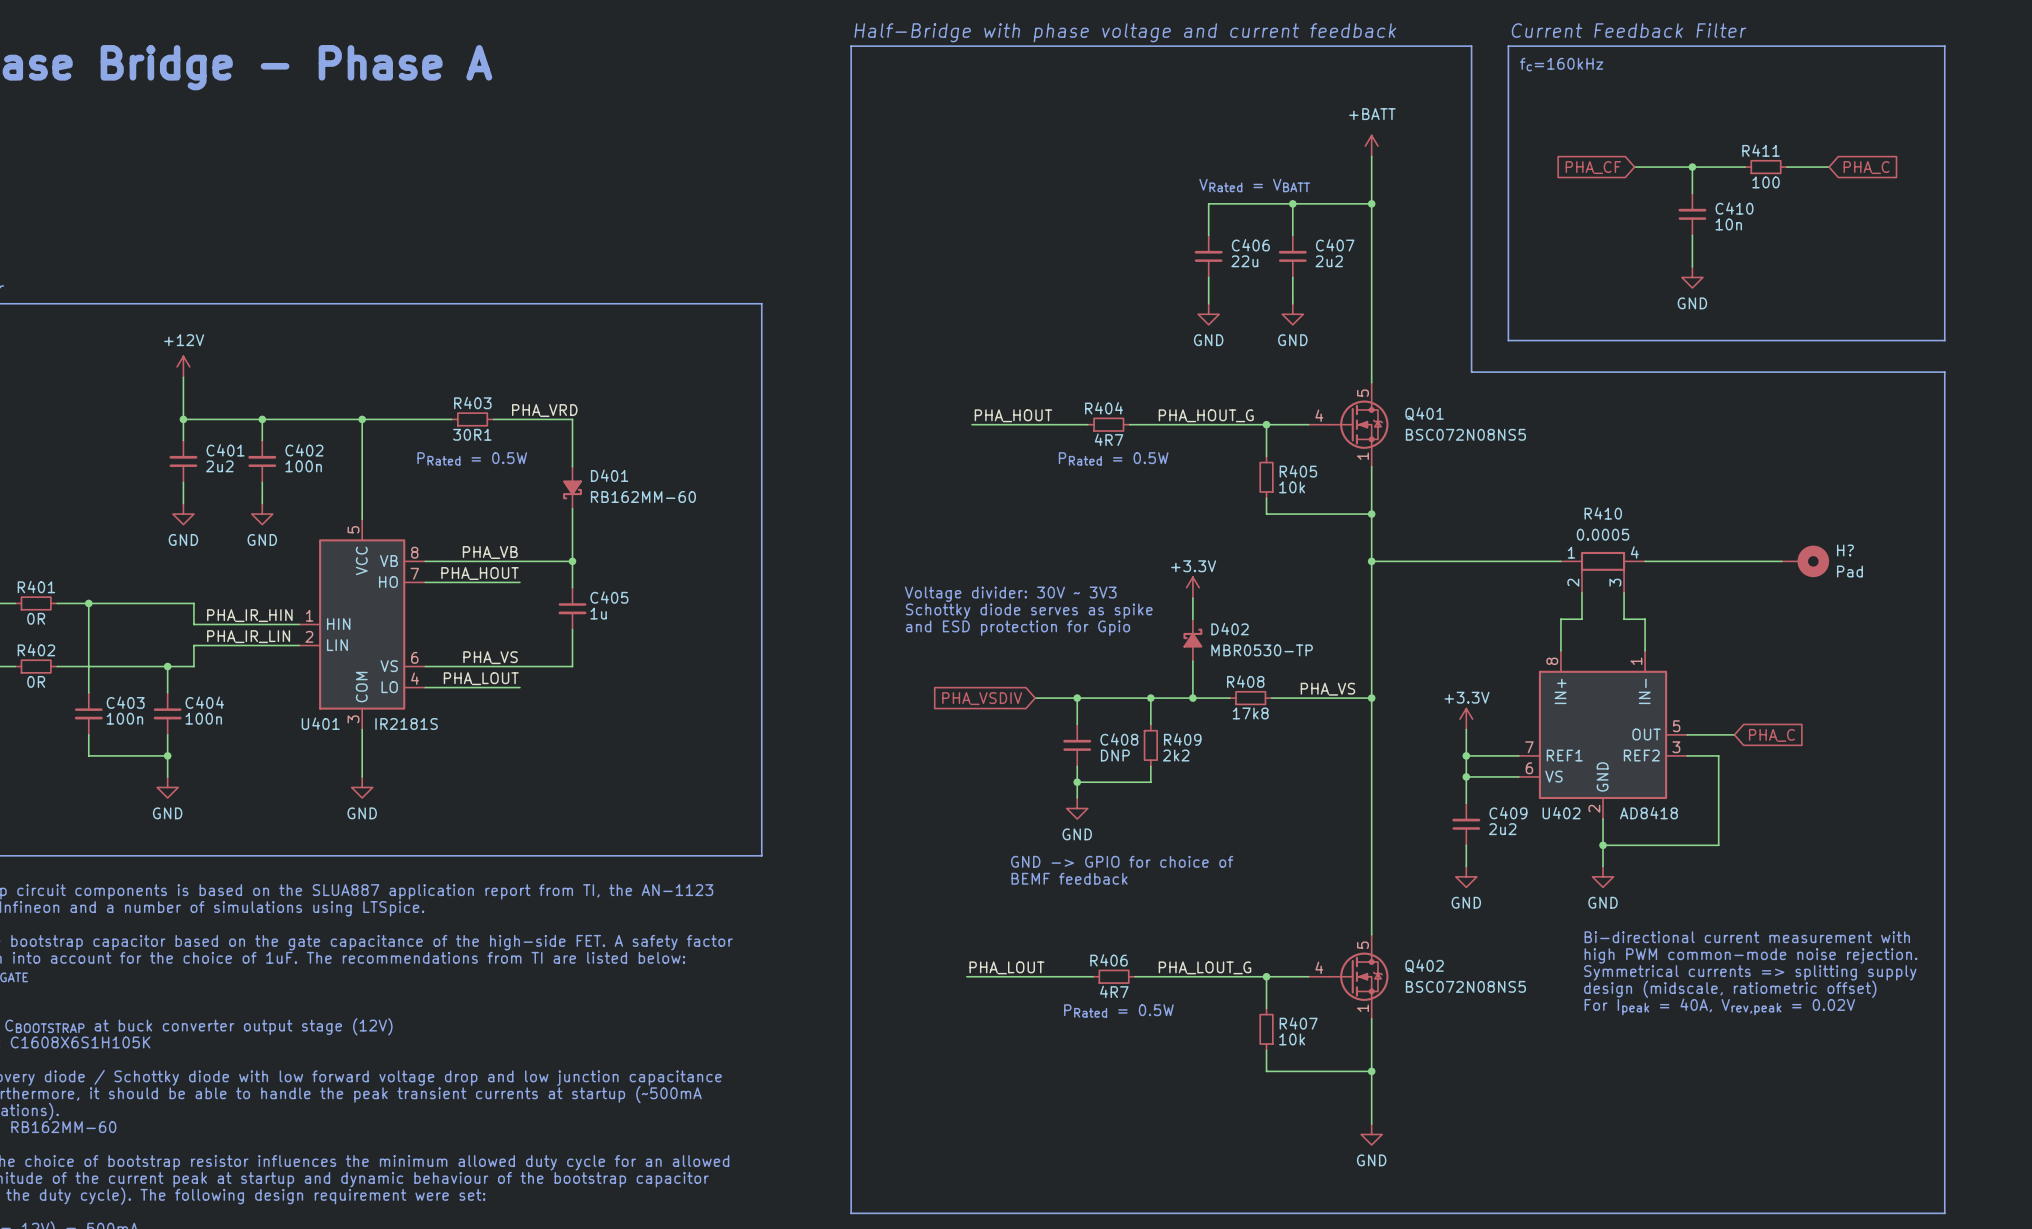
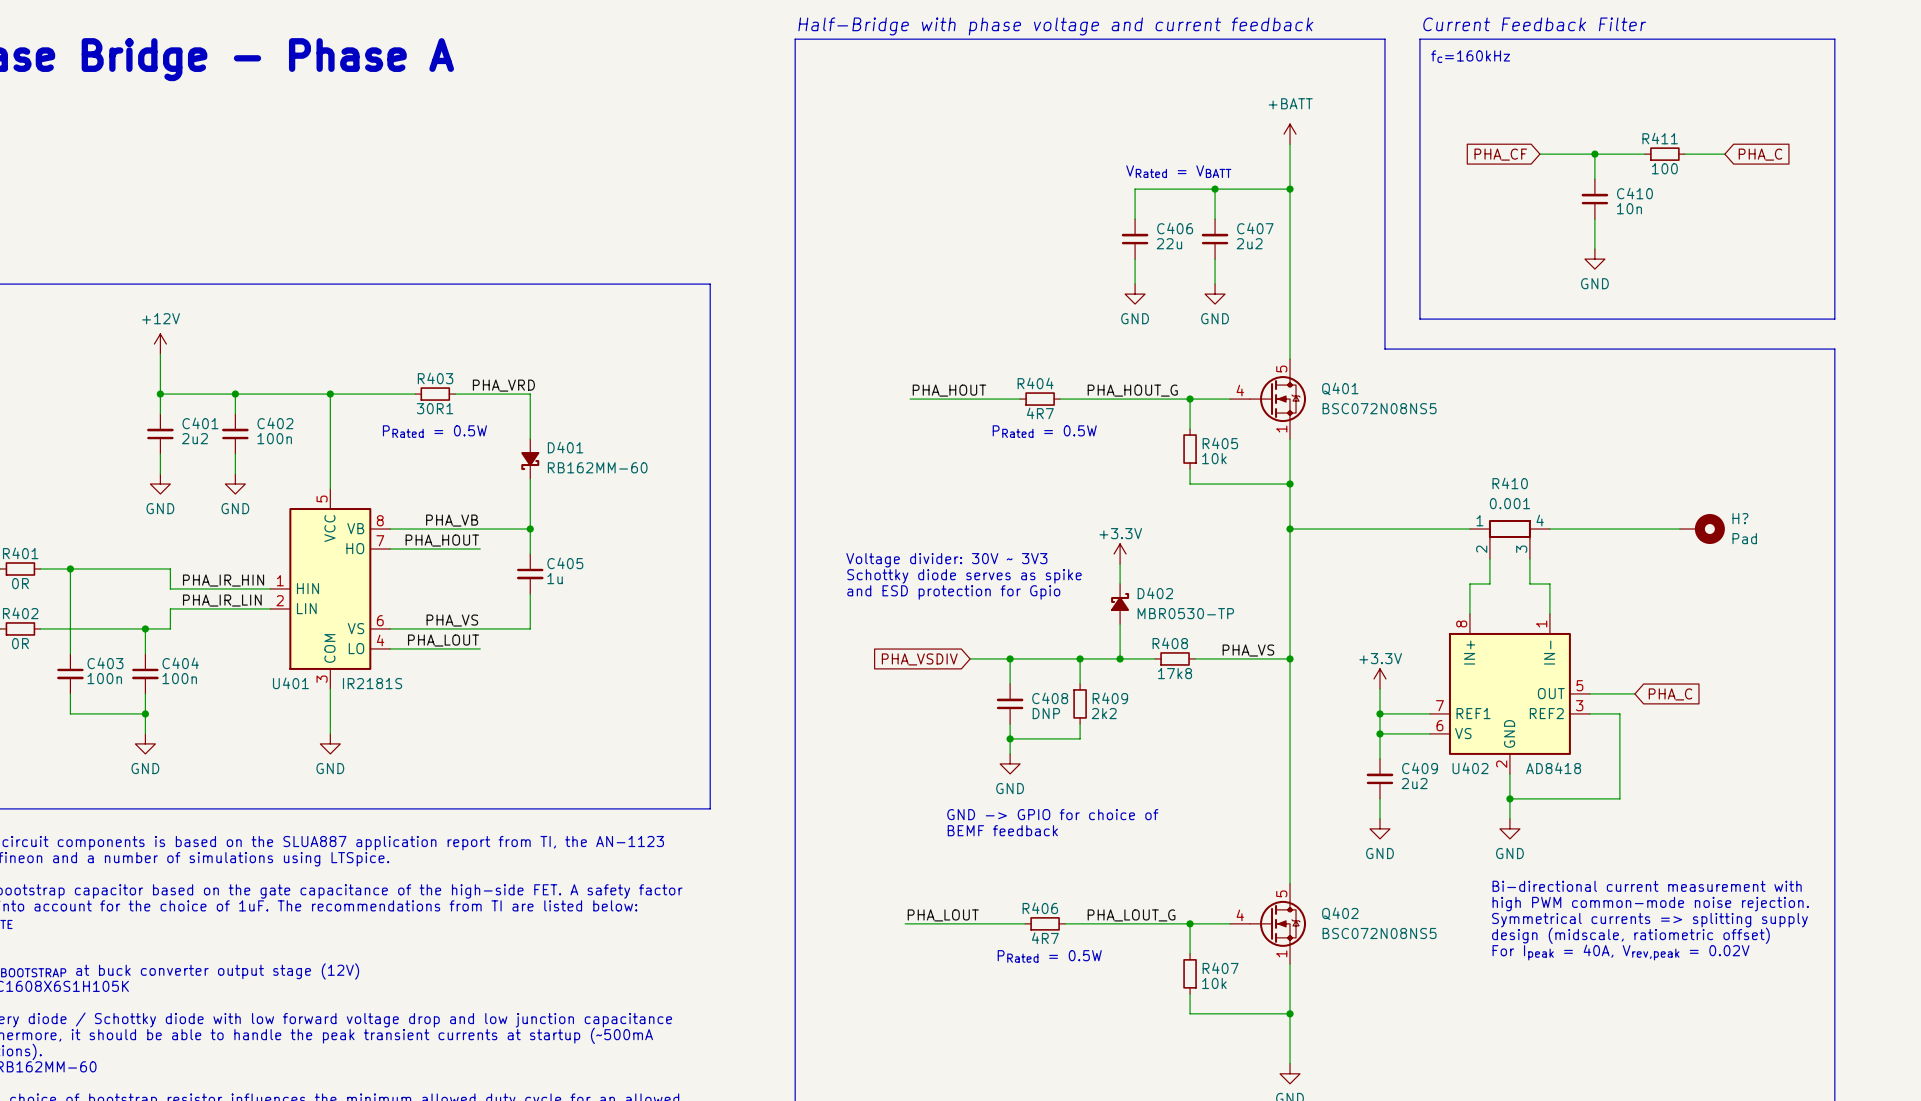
R410 value: 0.0005 (1603, 534) -> 0.001 (1509, 503)

